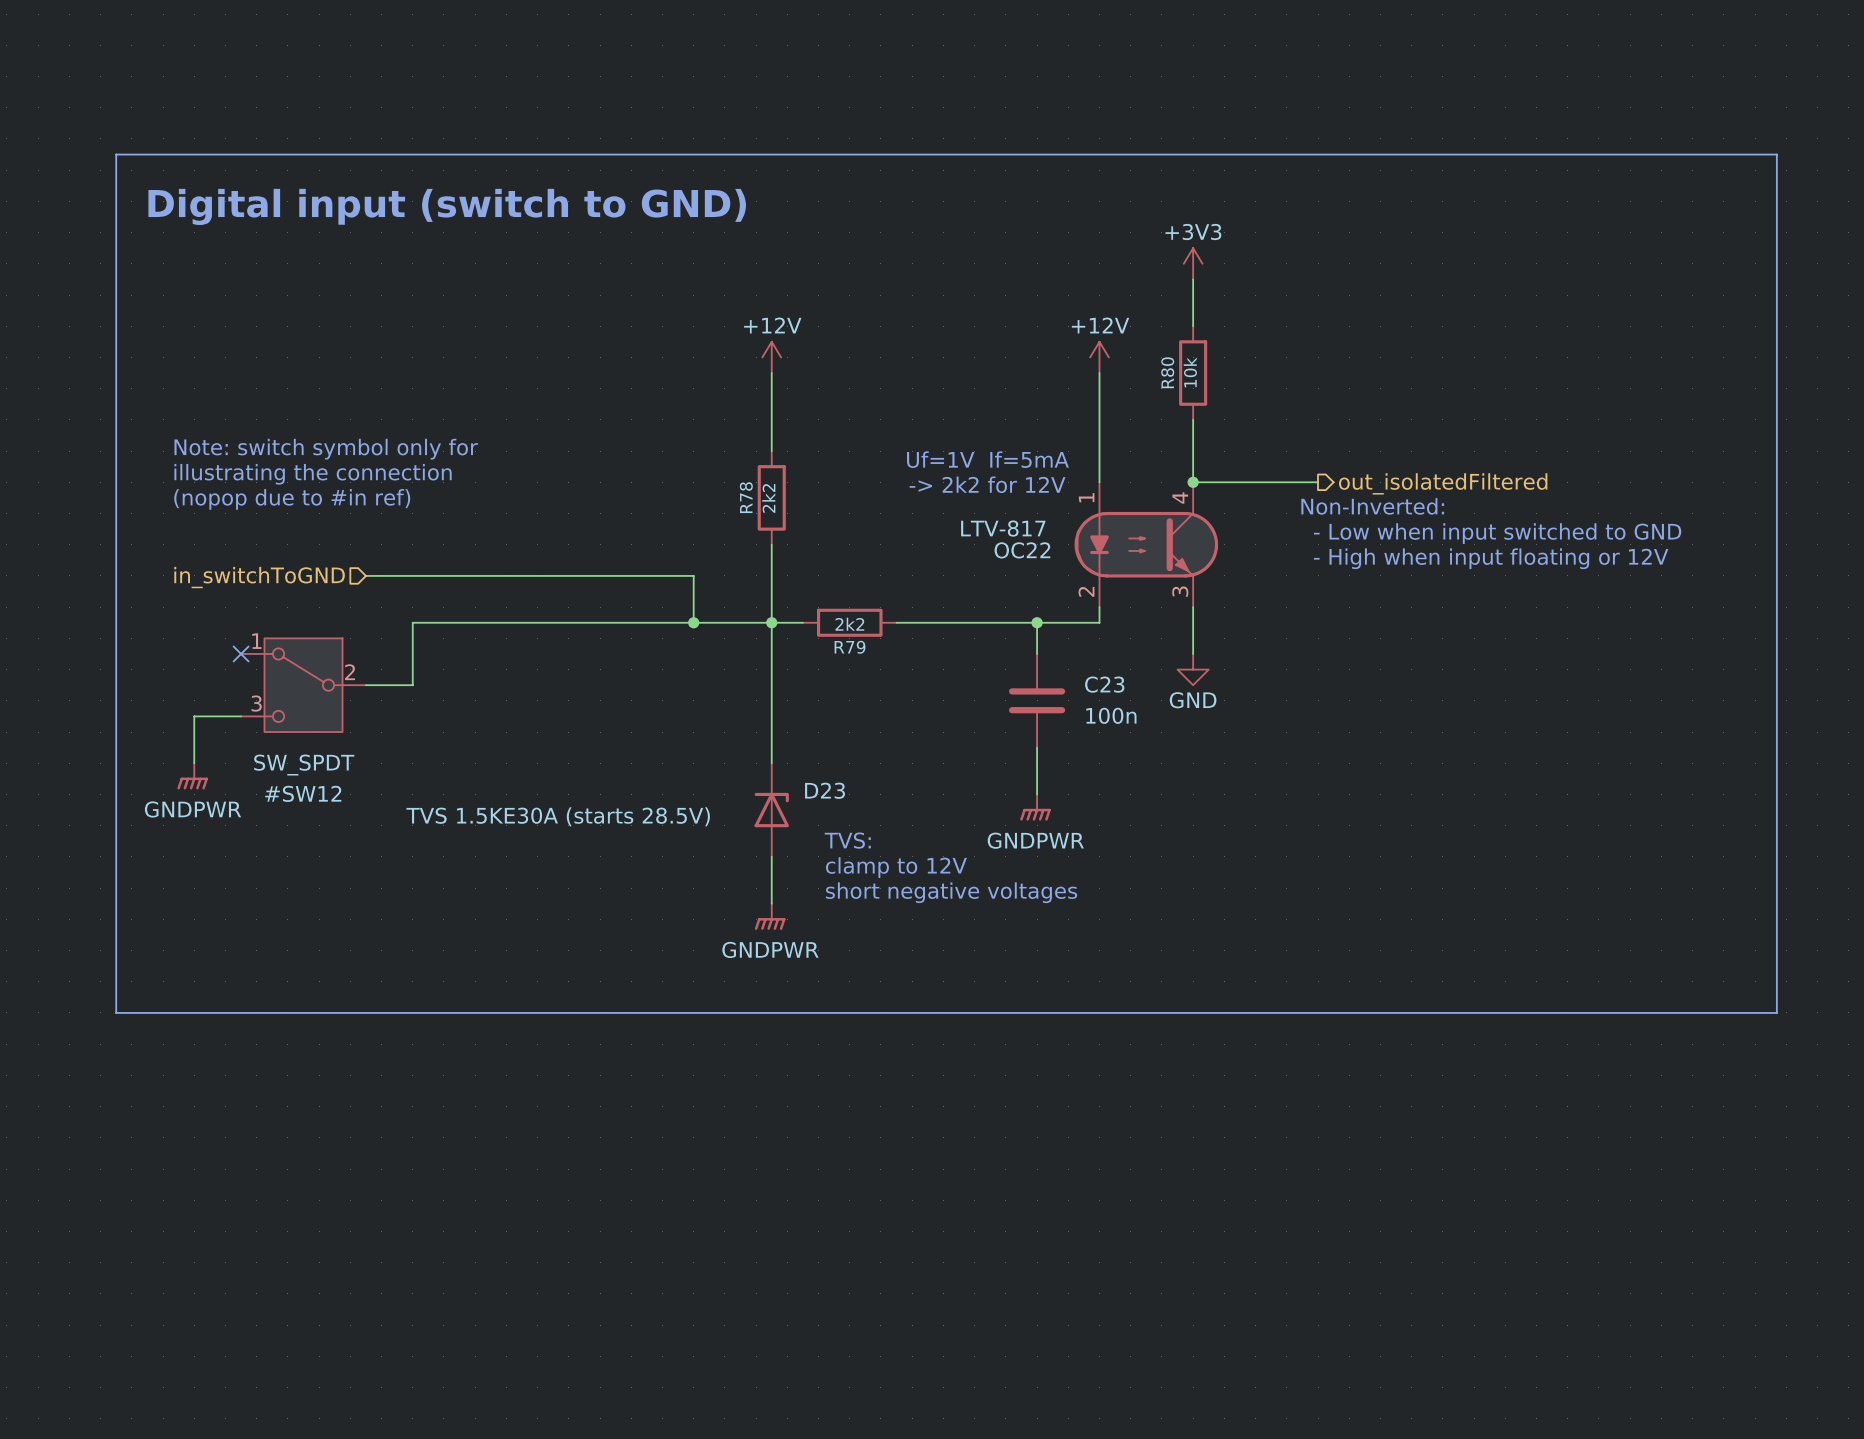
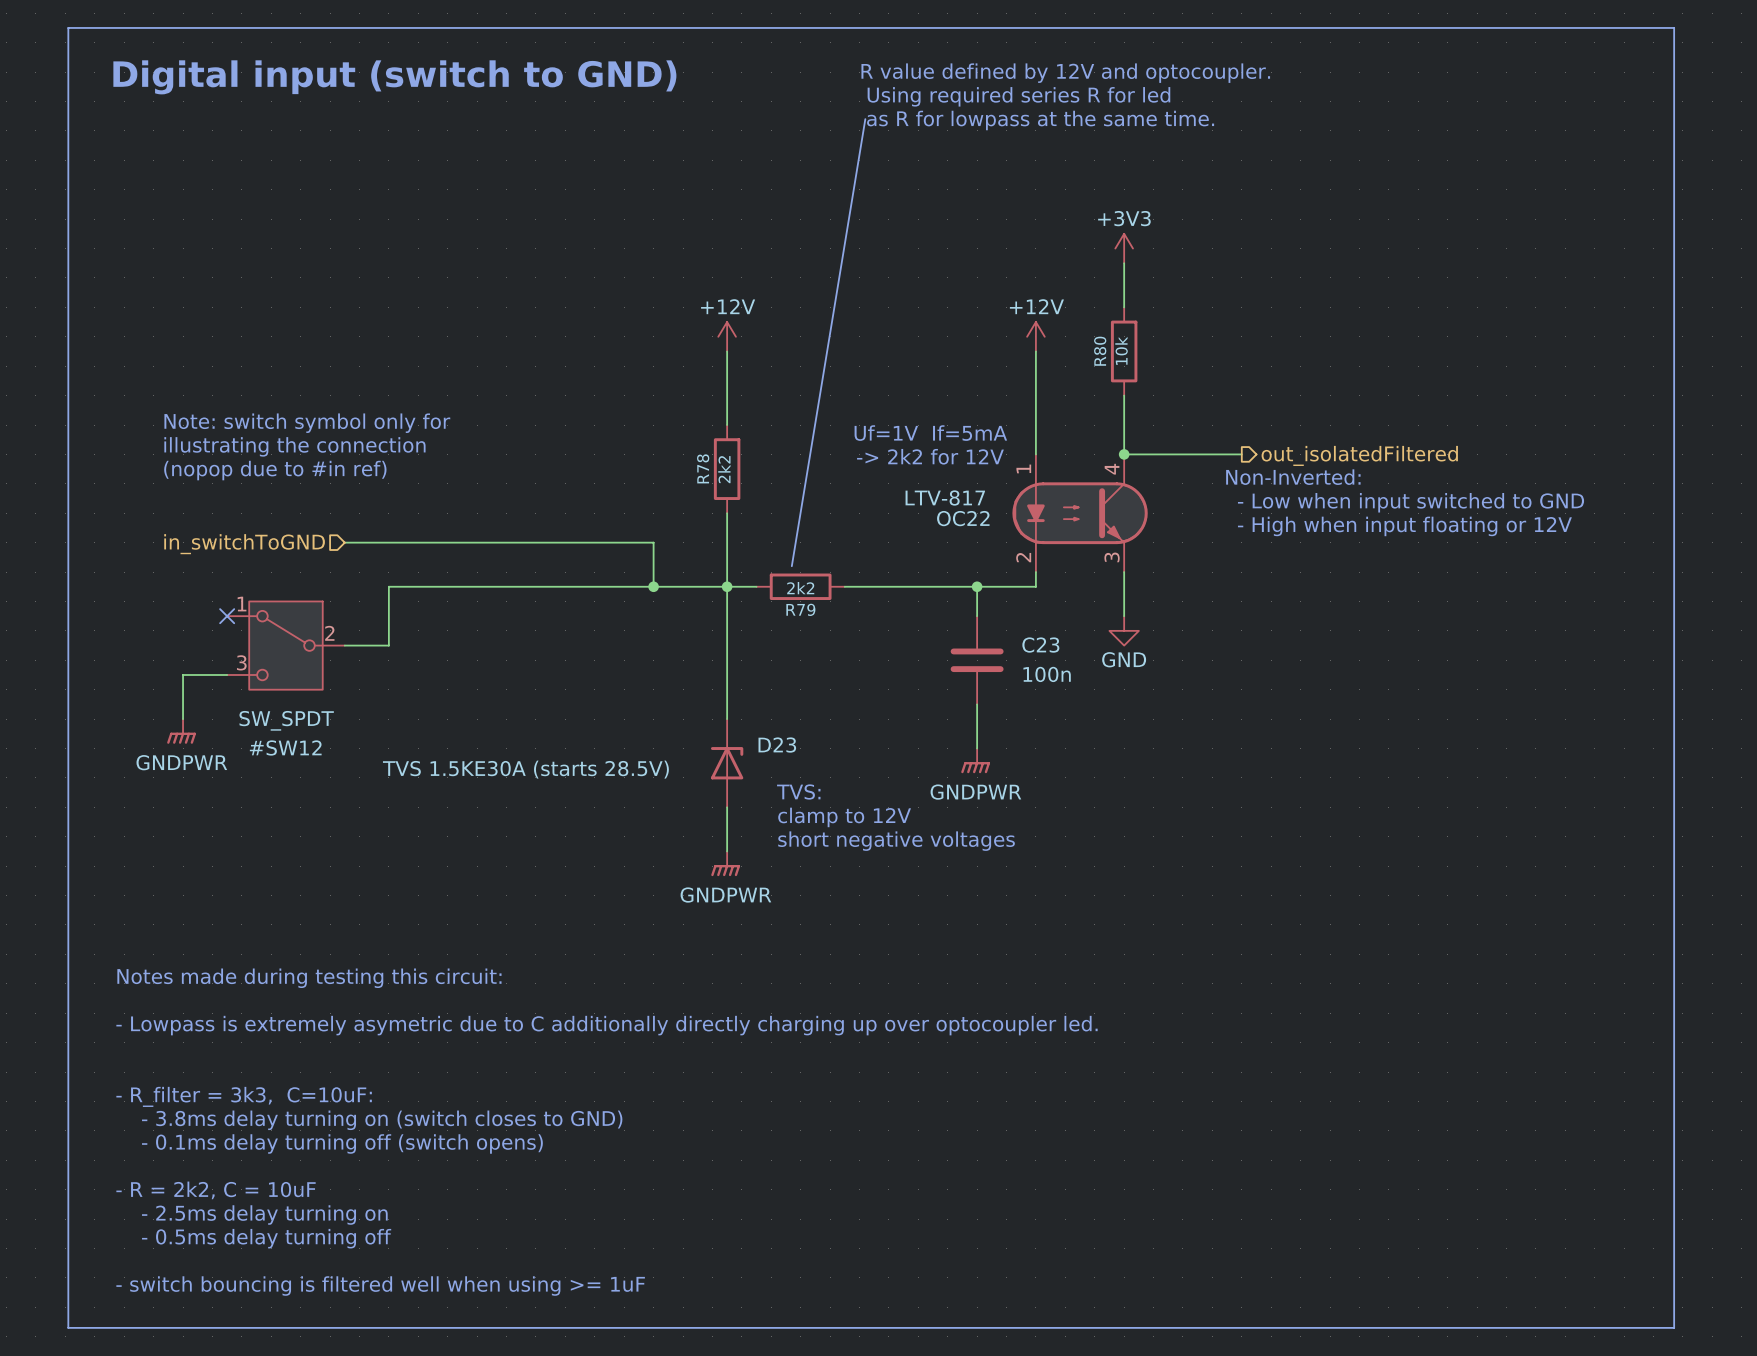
text: none -> R value defined by 12V and optocoupler. (1065, 73)
text: none -> Using required series R for led (1018, 96)
line: none -> (865, 119) (791, 566)
text: none -> as R for lowpass at the same time. (1040, 120)
line: (1776, 154) (116, 154) (116, 1012) (1776, 1012) -> (1674, 145) (1674, 27) (68, 27) (68, 1327) (1674, 1327) (1674, 954)
text position: Digital input (switch to GND) (447, 206) -> Digital input (switch to GND) (394, 77)
text: none -> Notes made during testing this circuit: (309, 978)
text: none -> - Lowpass is extremely asymetric due to C additionally directly charging up over optocoupler led. (607, 1025)
text: none -> - R_filter = 3k3, C=10uF: (244, 1096)
text: none -> - 3.8ms delay turning on (switch closes to GND) (382, 1120)
text: none -> - 0.1ms delay turning off (switch opens) (342, 1143)
text: none -> - R = 2k2, C = 10uF (216, 1190)
text: none -> - 2.5ms delay turning on (264, 1215)
text: none -> - 0.5ms delay turning off (266, 1238)
text: none -> - switch bouncing is filtered well when using >= 1uF (380, 1286)

